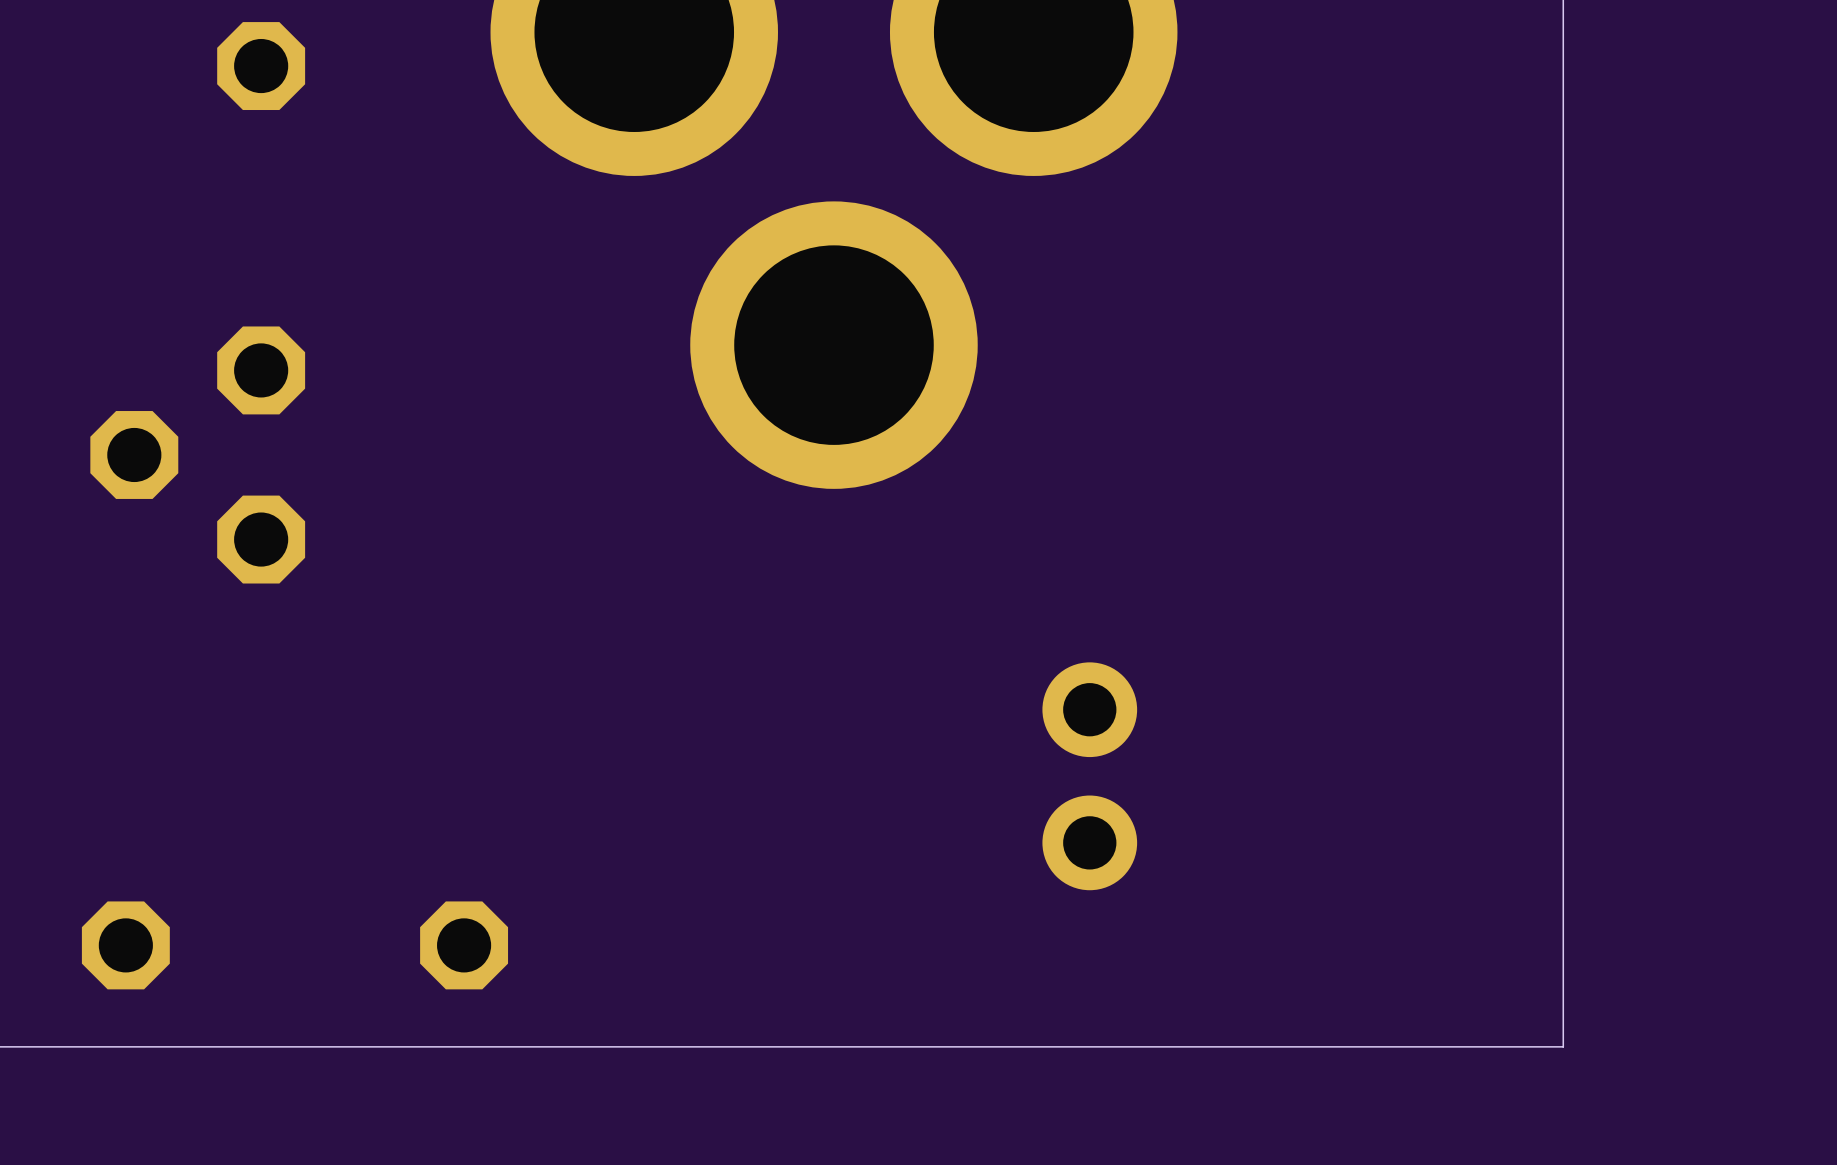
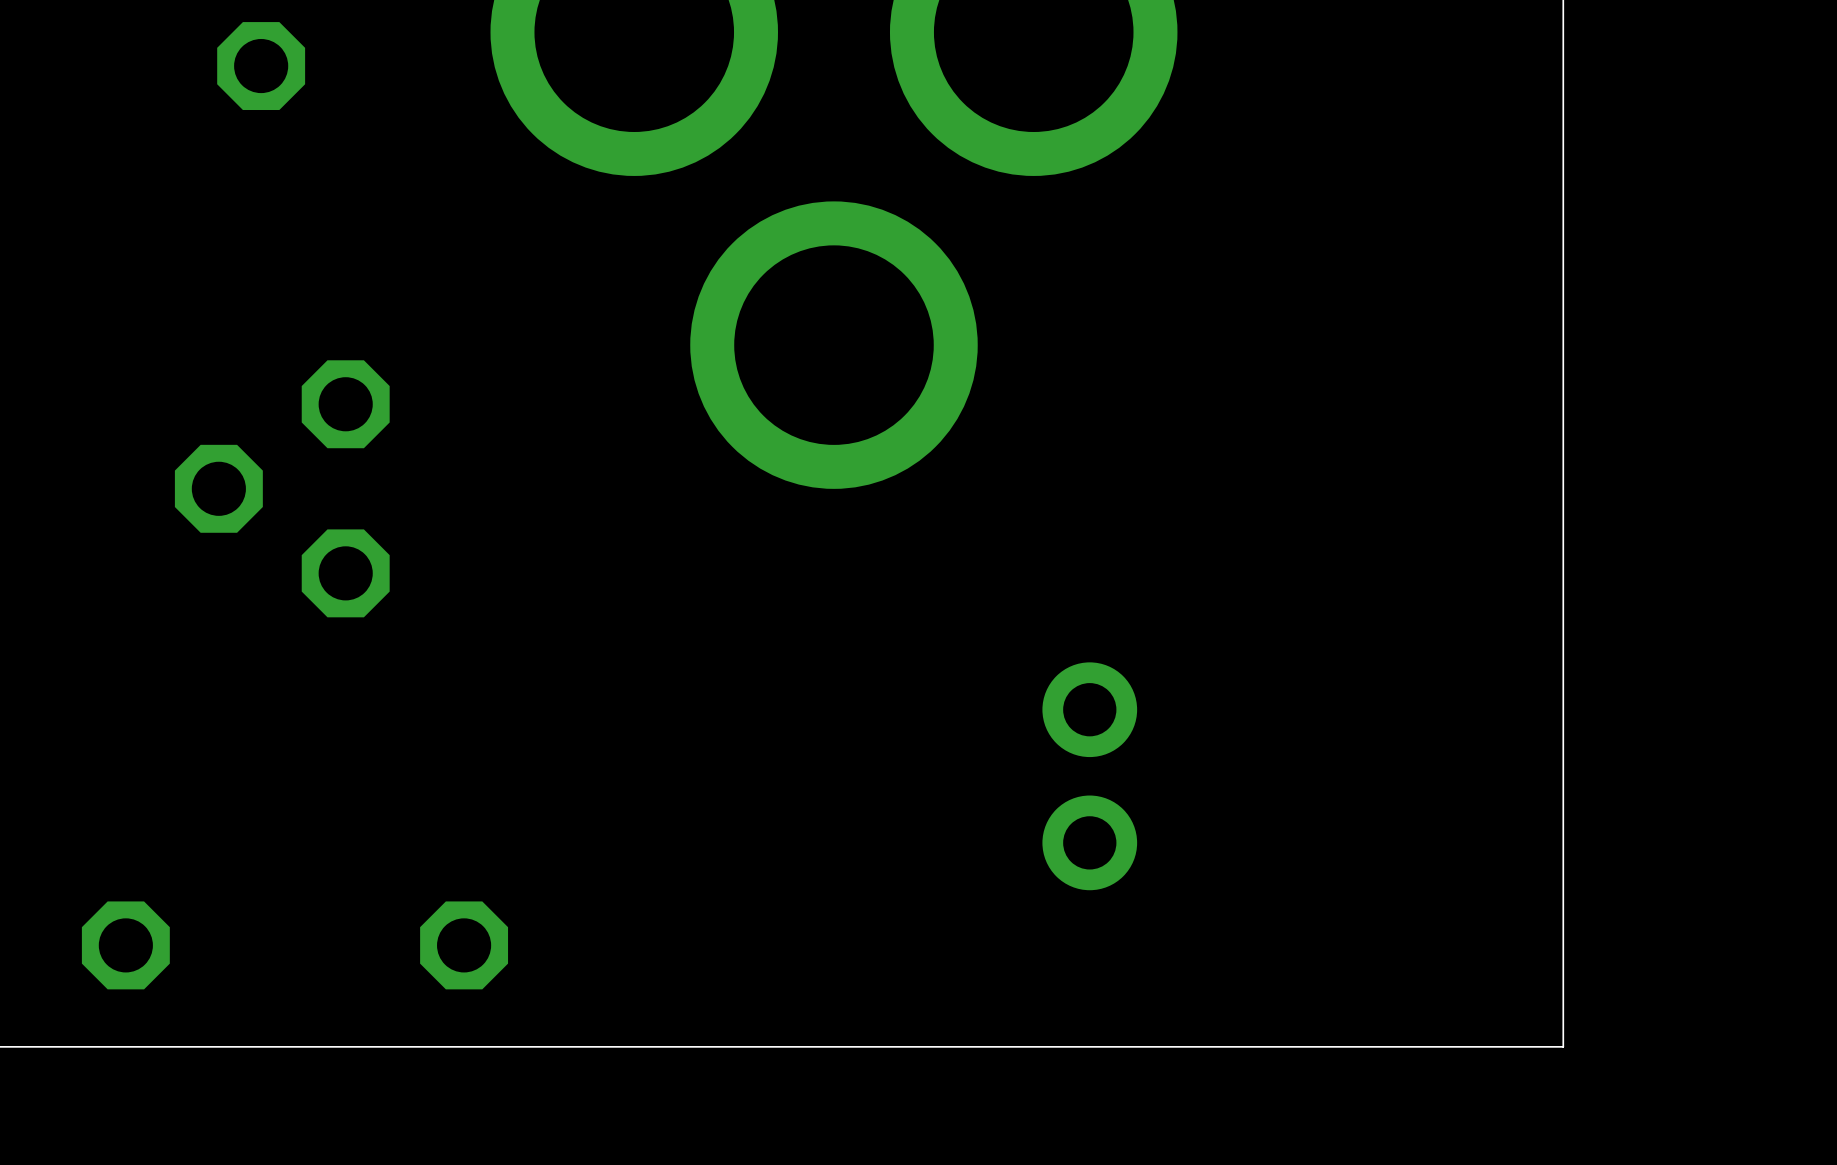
part position: (197, 454) -> (282, 488)

